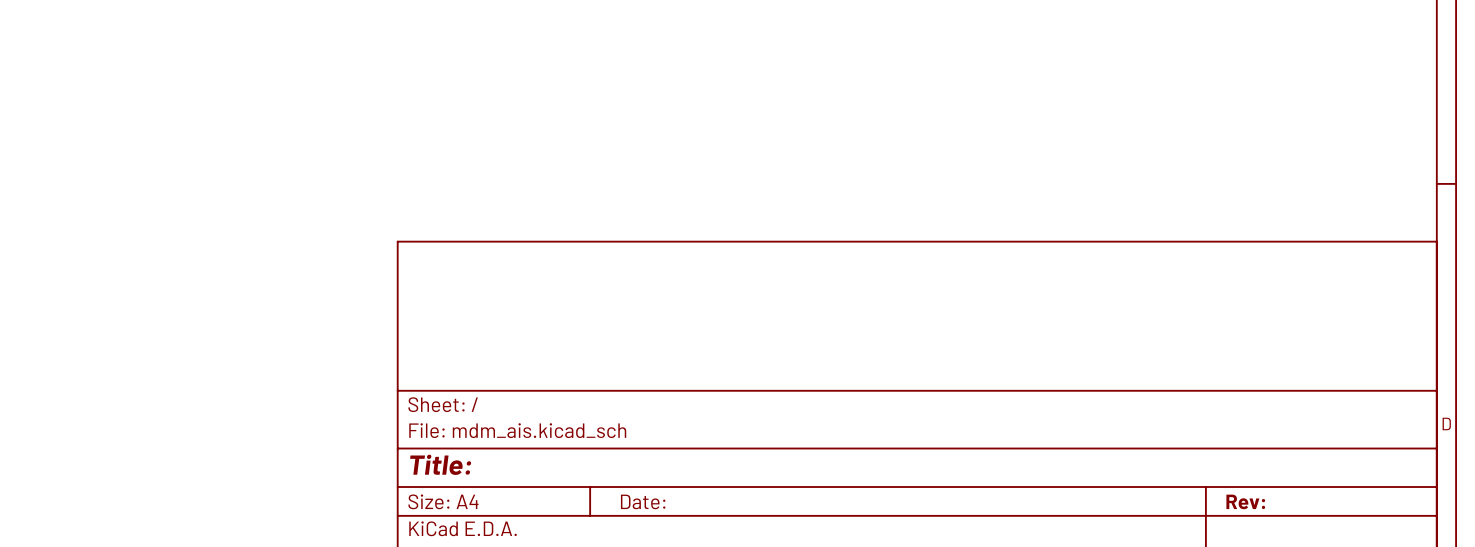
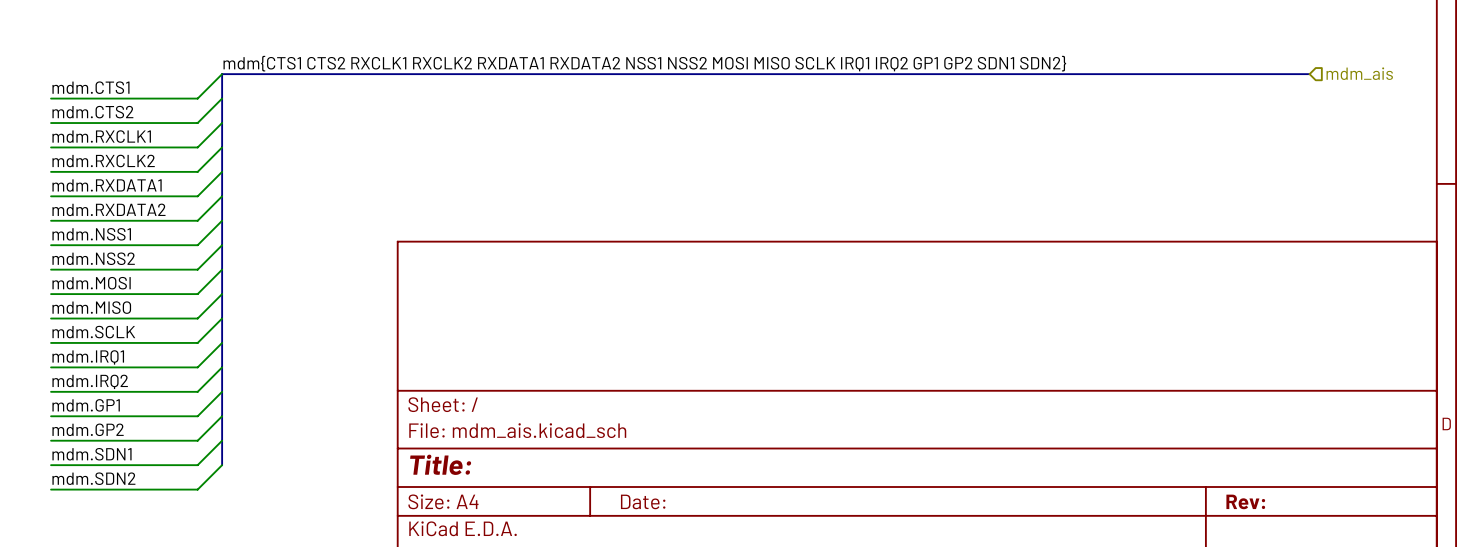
label: none -> mdm{CTS1 CTS2 RXCLK1 RXCLK2 RXDATA1 RXDATA2 NSS1 NSS2 MOSI MISO SCLK IRQ1 IRQ2 GP1 GP2 SDN1 SDN2} (644, 63)
hierarchical label: none -> mdm_ais (1359, 73)
wire: none -> (222, 74) (197, 98) (51, 98)
bus: none -> (1309, 74) (222, 74) (222, 465)
label: none -> mdm.CTS1 (90, 87)
wire: none -> (222, 98) (197, 123) (51, 123)
label: none -> mdm.CTS2 (92, 112)
wire: none -> (222, 123) (197, 147) (51, 147)
label: none -> mdm.RXCLK1 (101, 136)
wire: none -> (222, 147) (197, 171) (51, 171)
label: none -> mdm.RXCLK2 (103, 161)
wire: none -> (222, 171) (197, 196) (51, 196)
label: none -> mdm.RXDATA1 (107, 185)
wire: none -> (222, 196) (197, 220) (51, 220)
label: none -> mdm.RXDATA2 (108, 209)
wire: none -> (222, 220) (197, 245) (51, 245)
label: none -> mdm.NSS1 (91, 234)
wire: none -> (222, 245) (197, 269) (51, 269)
label: none -> mdm.NSS2 (93, 258)
wire: none -> (222, 269) (197, 294) (51, 294)
label: none -> mdm.MOSI (91, 283)
wire: none -> (222, 294) (197, 318) (51, 318)
label: none -> mdm.MISO (91, 307)
wire: none -> (222, 318) (197, 342) (51, 342)
label: none -> mdm.SCLK (93, 332)
wire: none -> (222, 342) (197, 367) (51, 367)
label: none -> mdm.IRQ1 (88, 357)
wire: none -> (222, 367) (197, 391) (51, 391)
label: none -> mdm.IRQ2 (90, 381)
wire: none -> (222, 391) (197, 416) (51, 416)
label: none -> mdm.GP1 (86, 405)
wire: none -> (222, 416) (197, 440) (51, 440)
label: none -> mdm.GP2 (88, 429)
wire: none -> (222, 440) (197, 465) (51, 465)
label: none -> mdm.SDN1 (92, 454)
wire: none -> (222, 465) (197, 489) (51, 489)
label: none -> mdm.SDN2 (93, 478)

